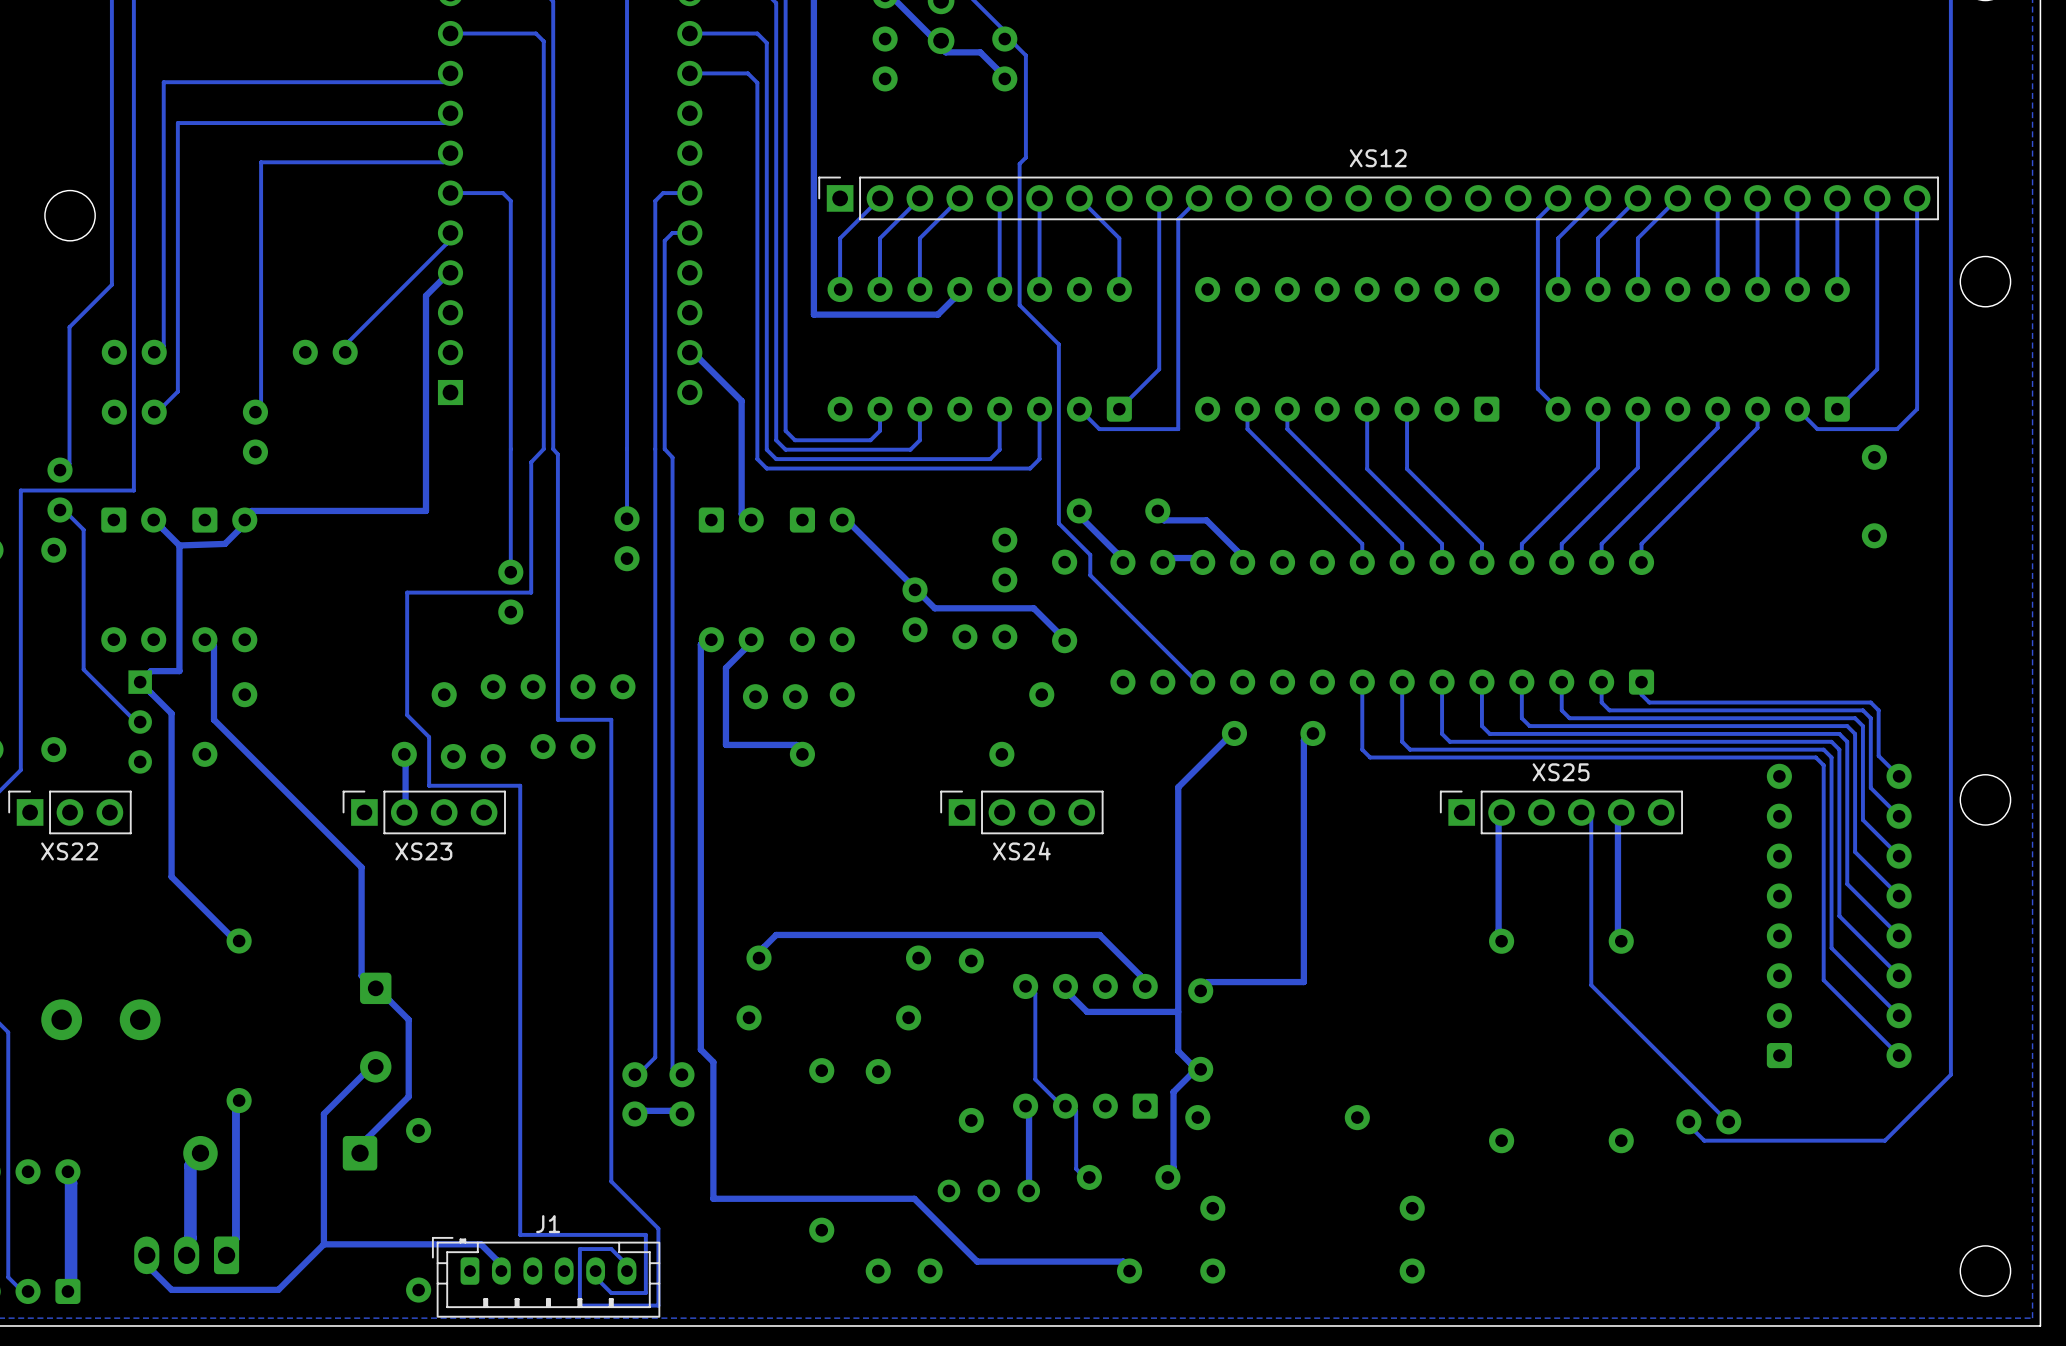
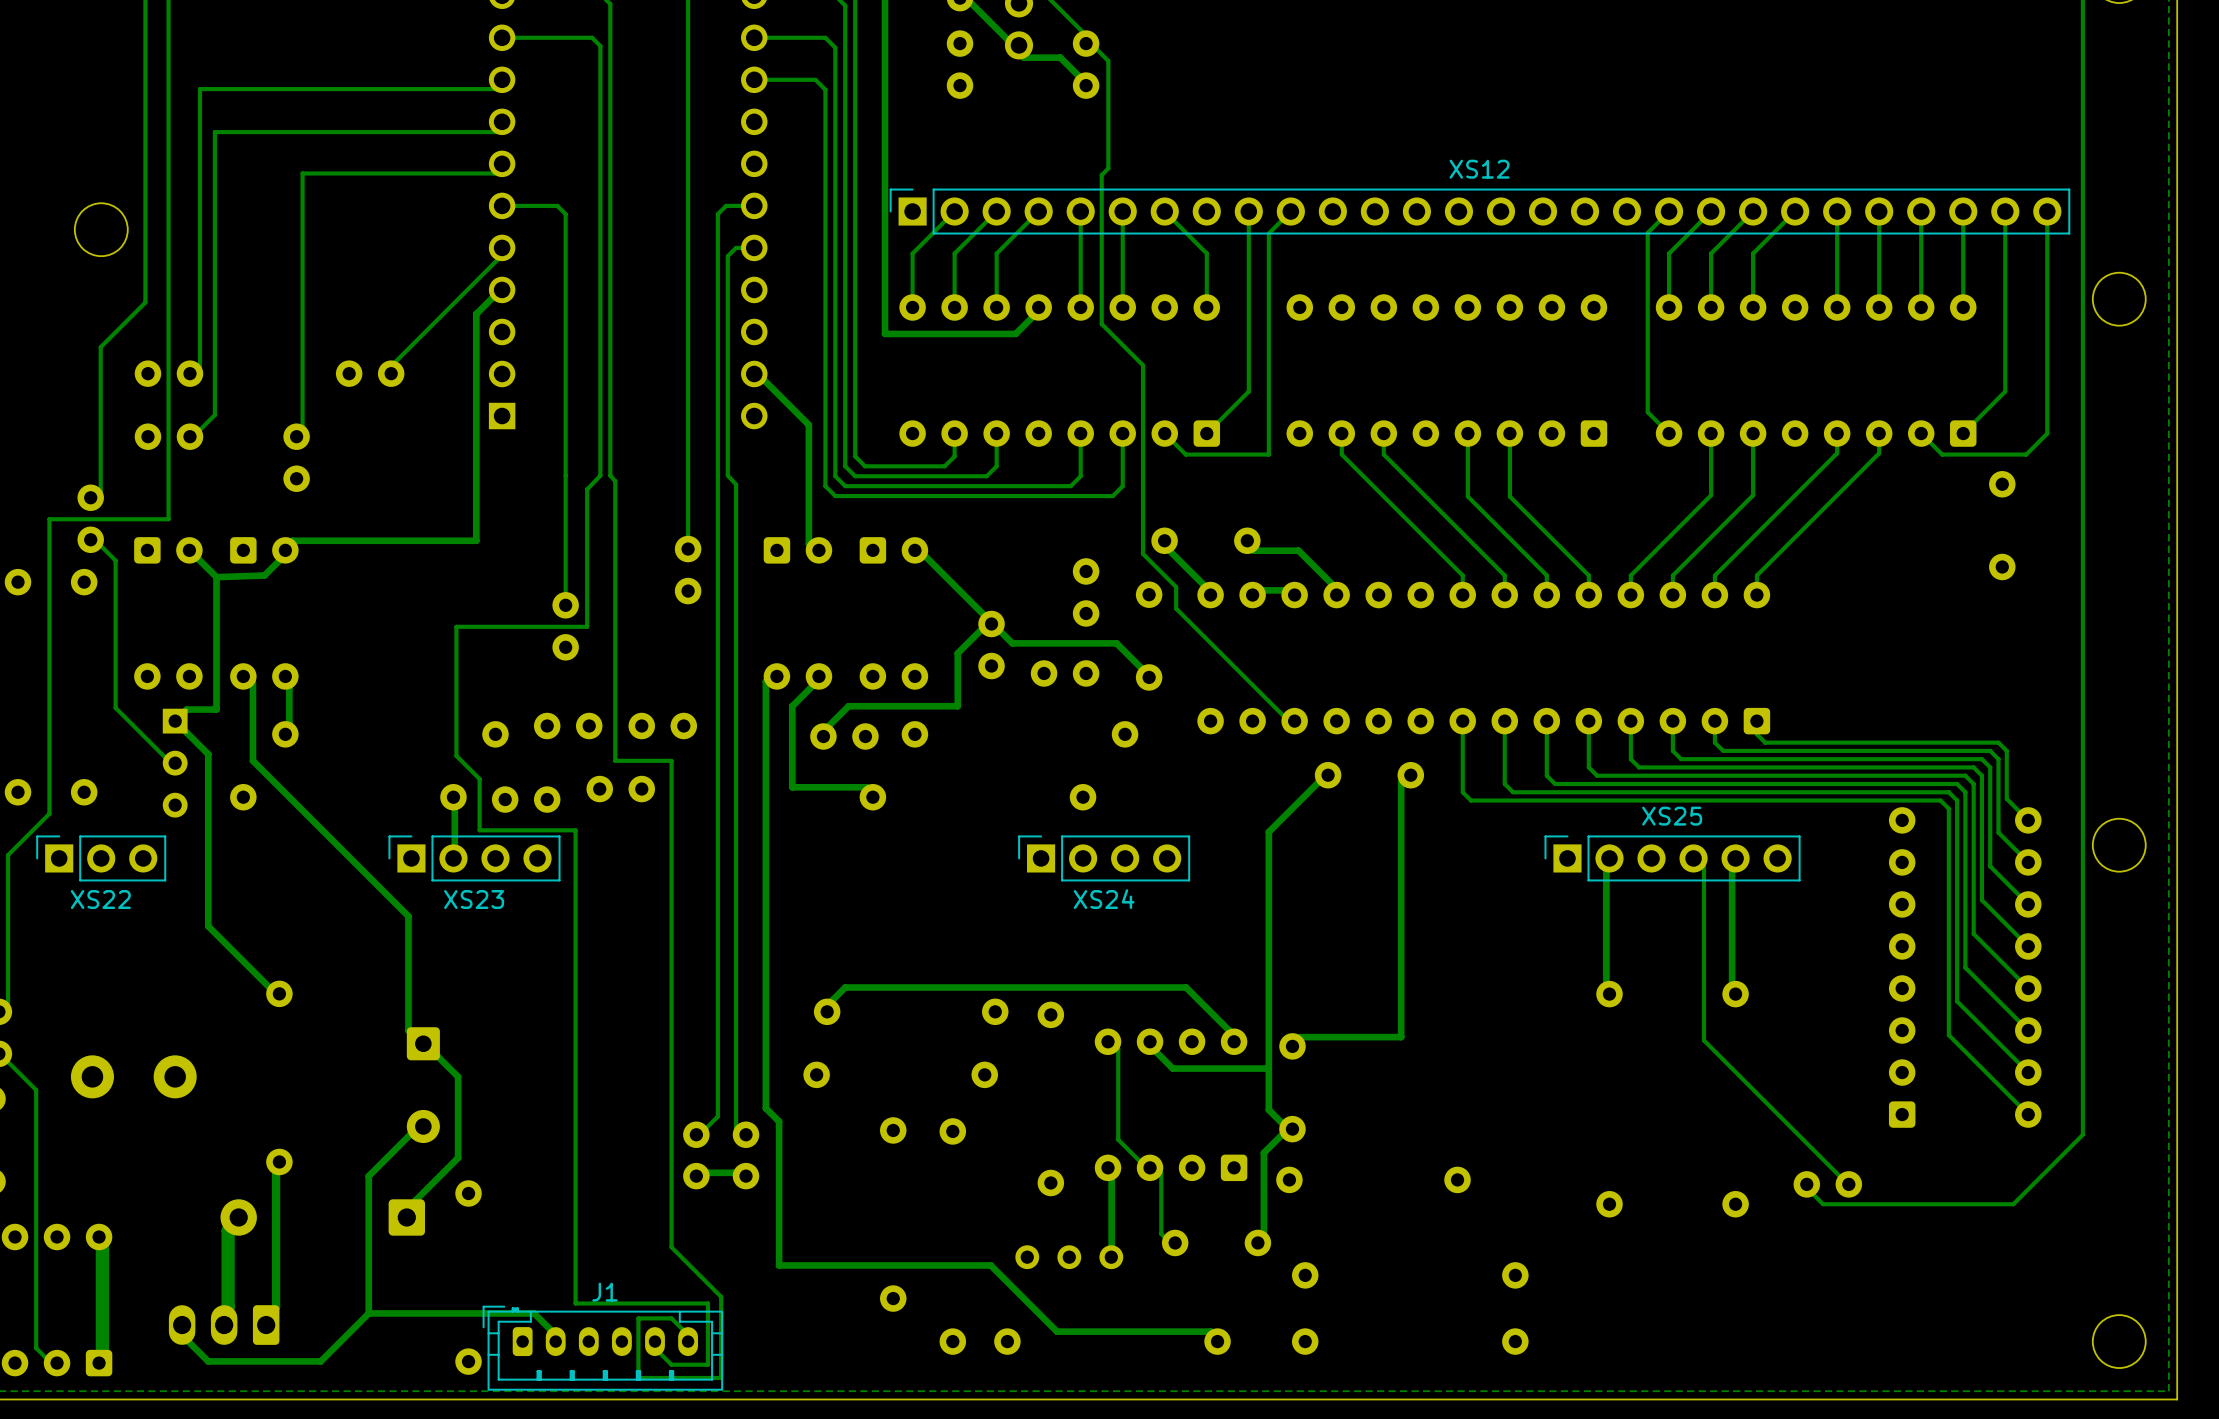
track: none -> (991, 623) (980, 630) (957, 653) (957, 706) (848, 706) (828, 726) (823, 736)
track: none -> (285, 676) (289, 688) (289, 722) (285, 734)

